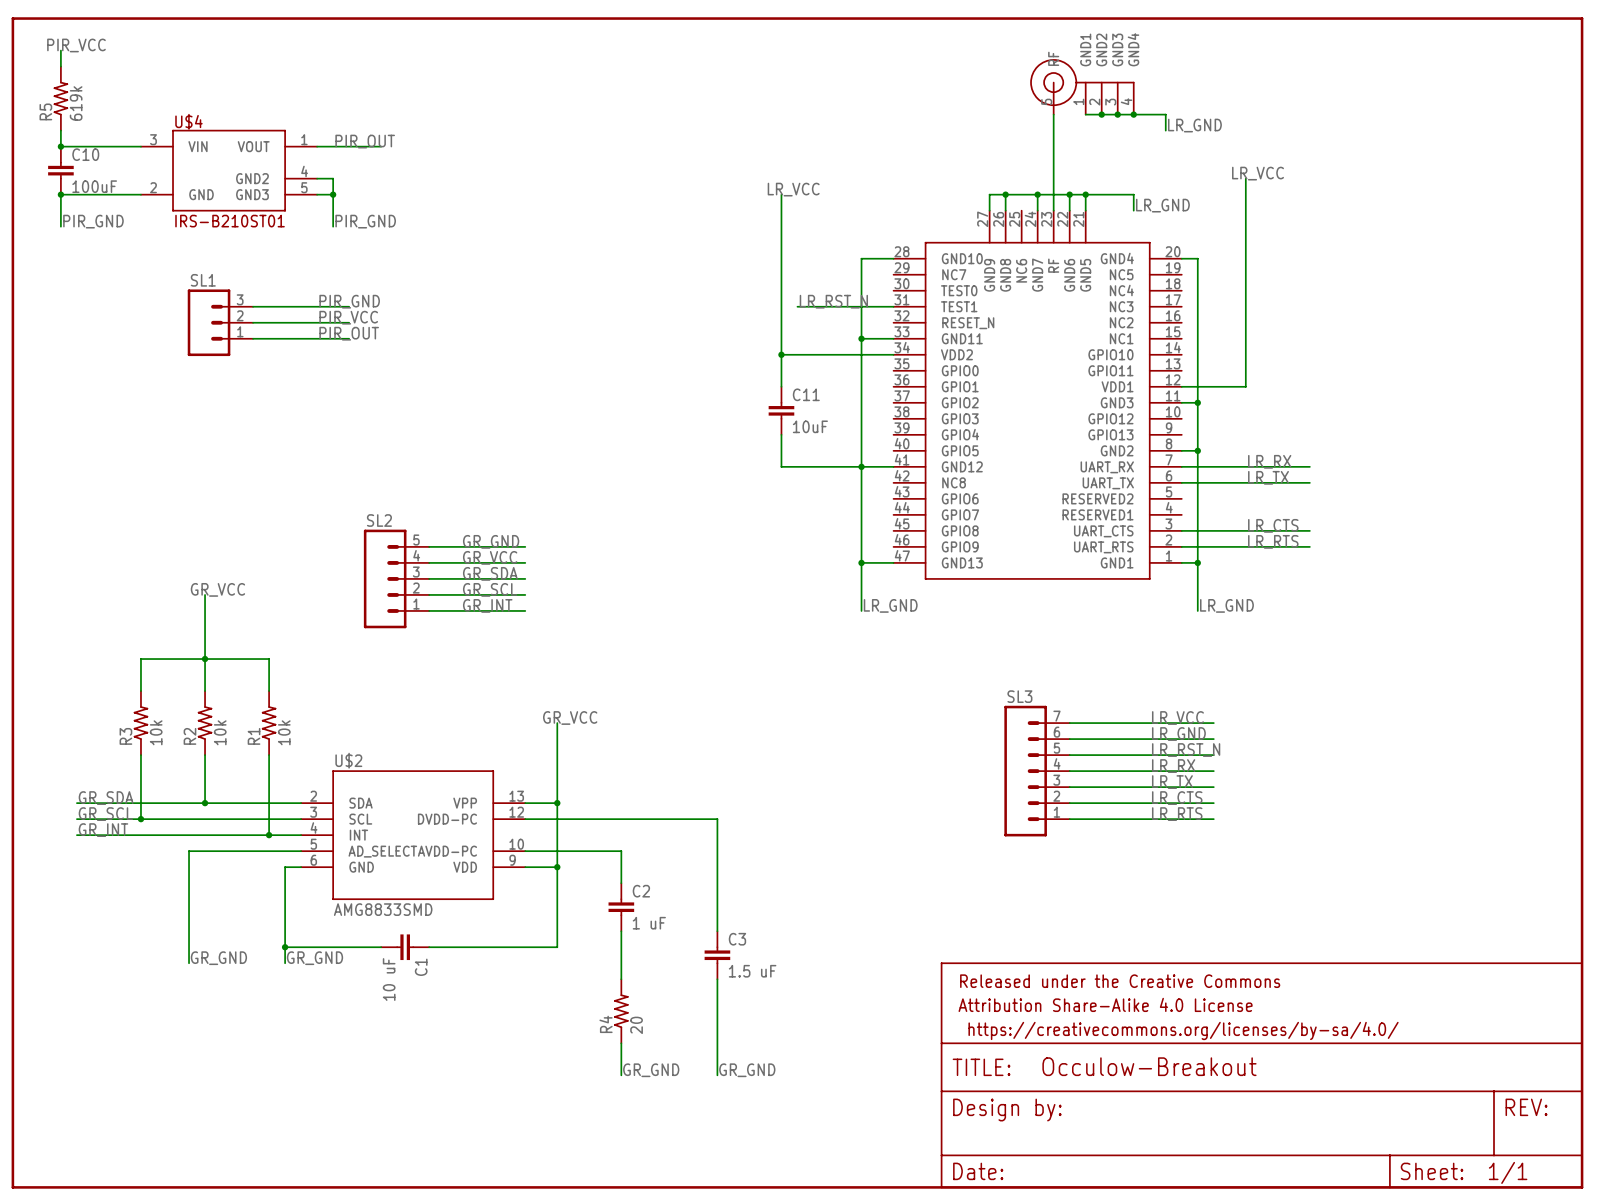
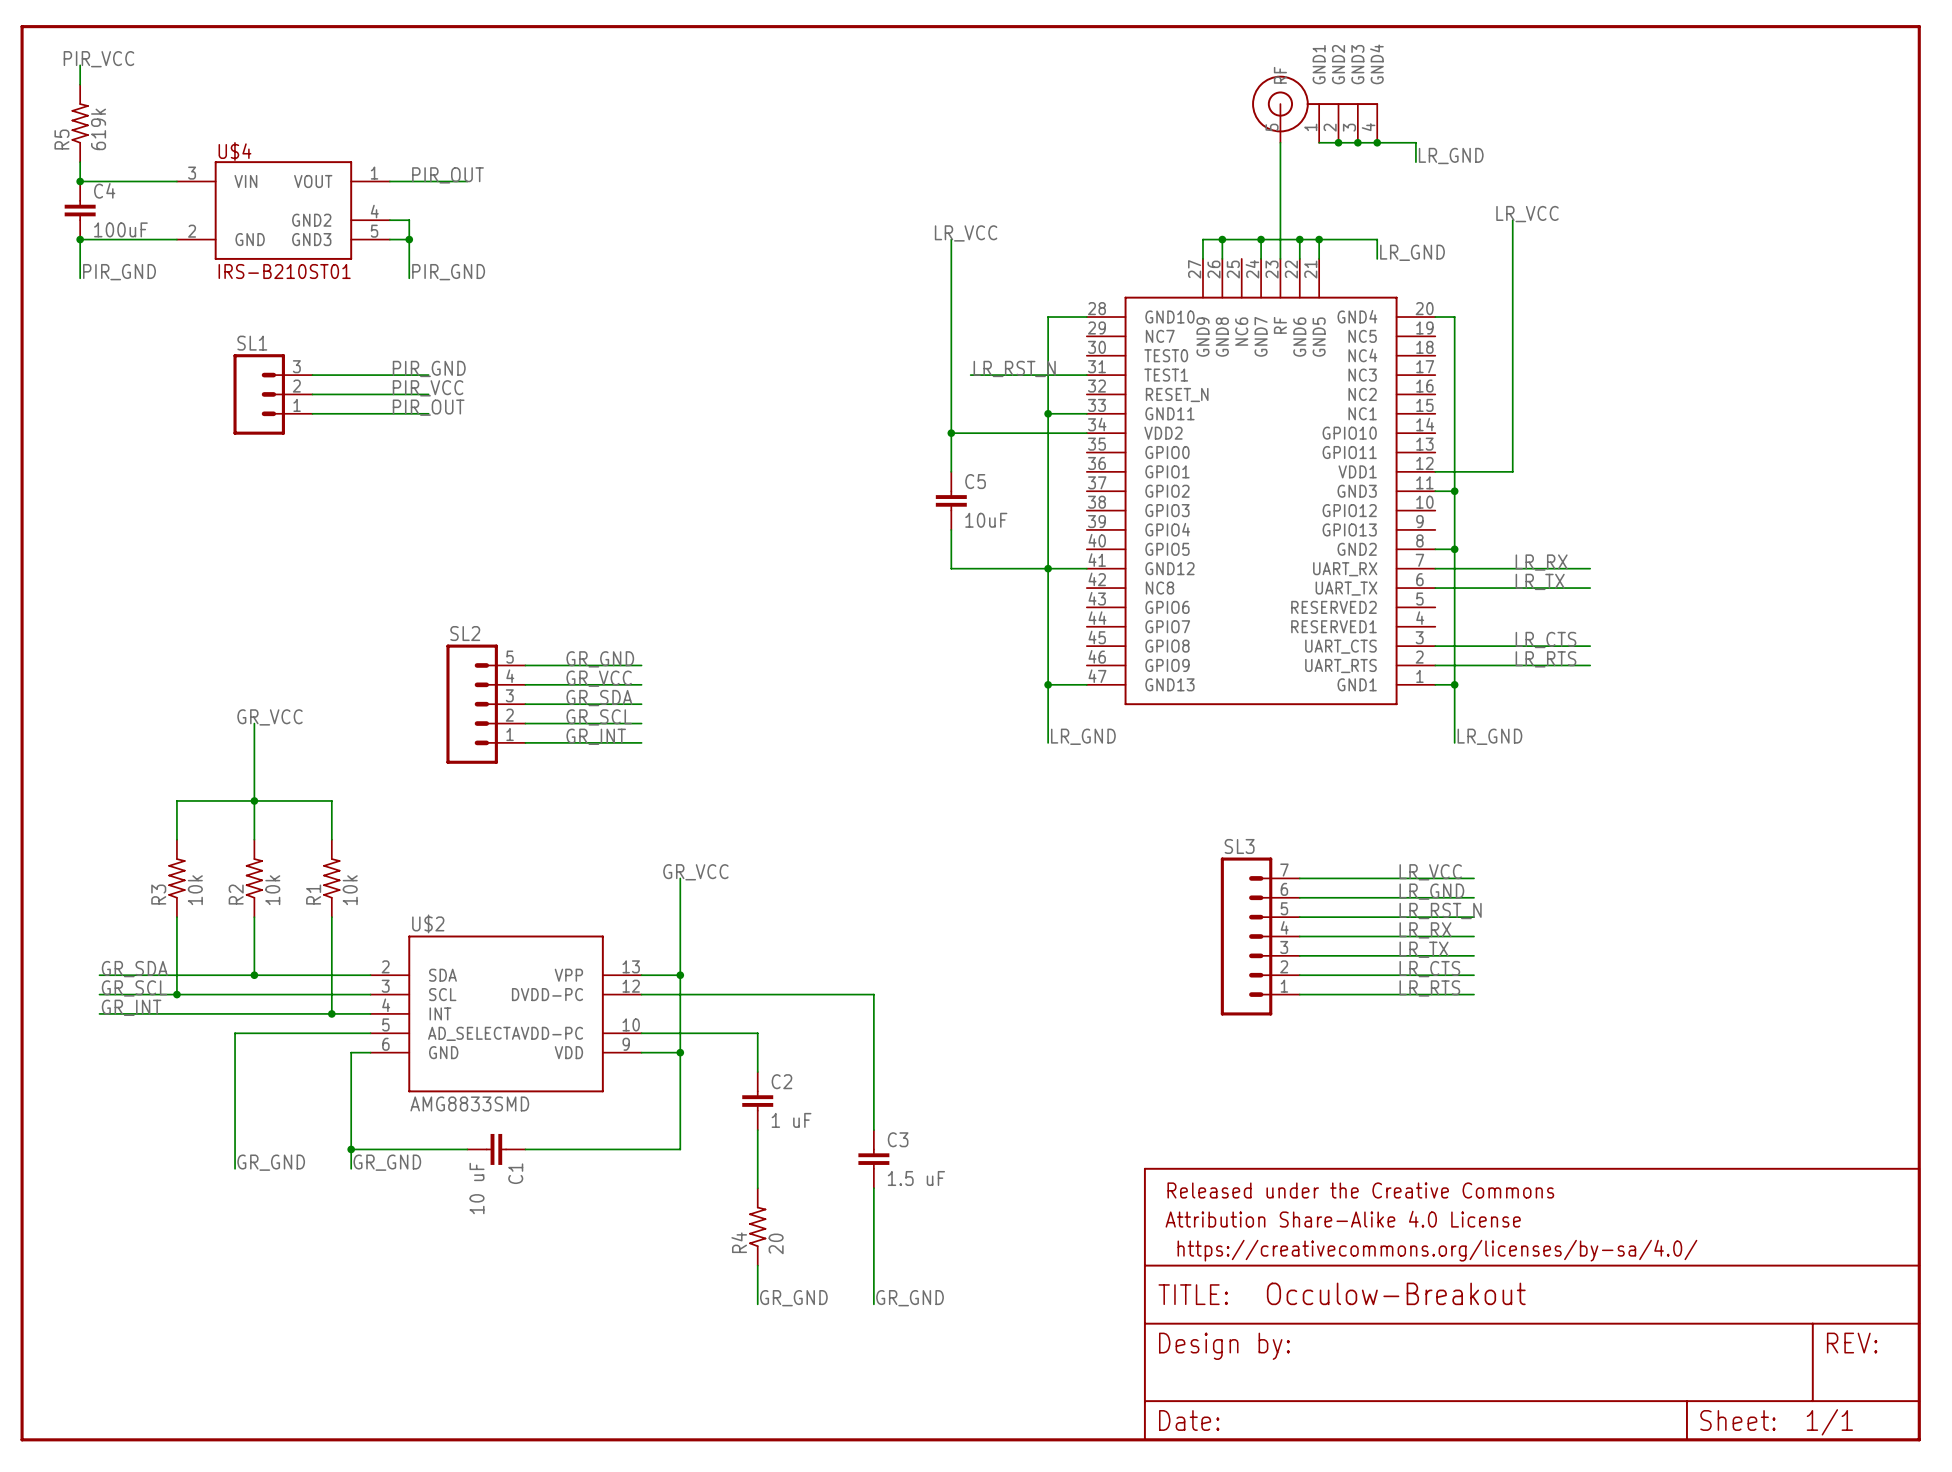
C10 name: C10 (85, 154) -> C4 (104, 190)
C11 name: C11 (806, 394) -> C5 (975, 481)

